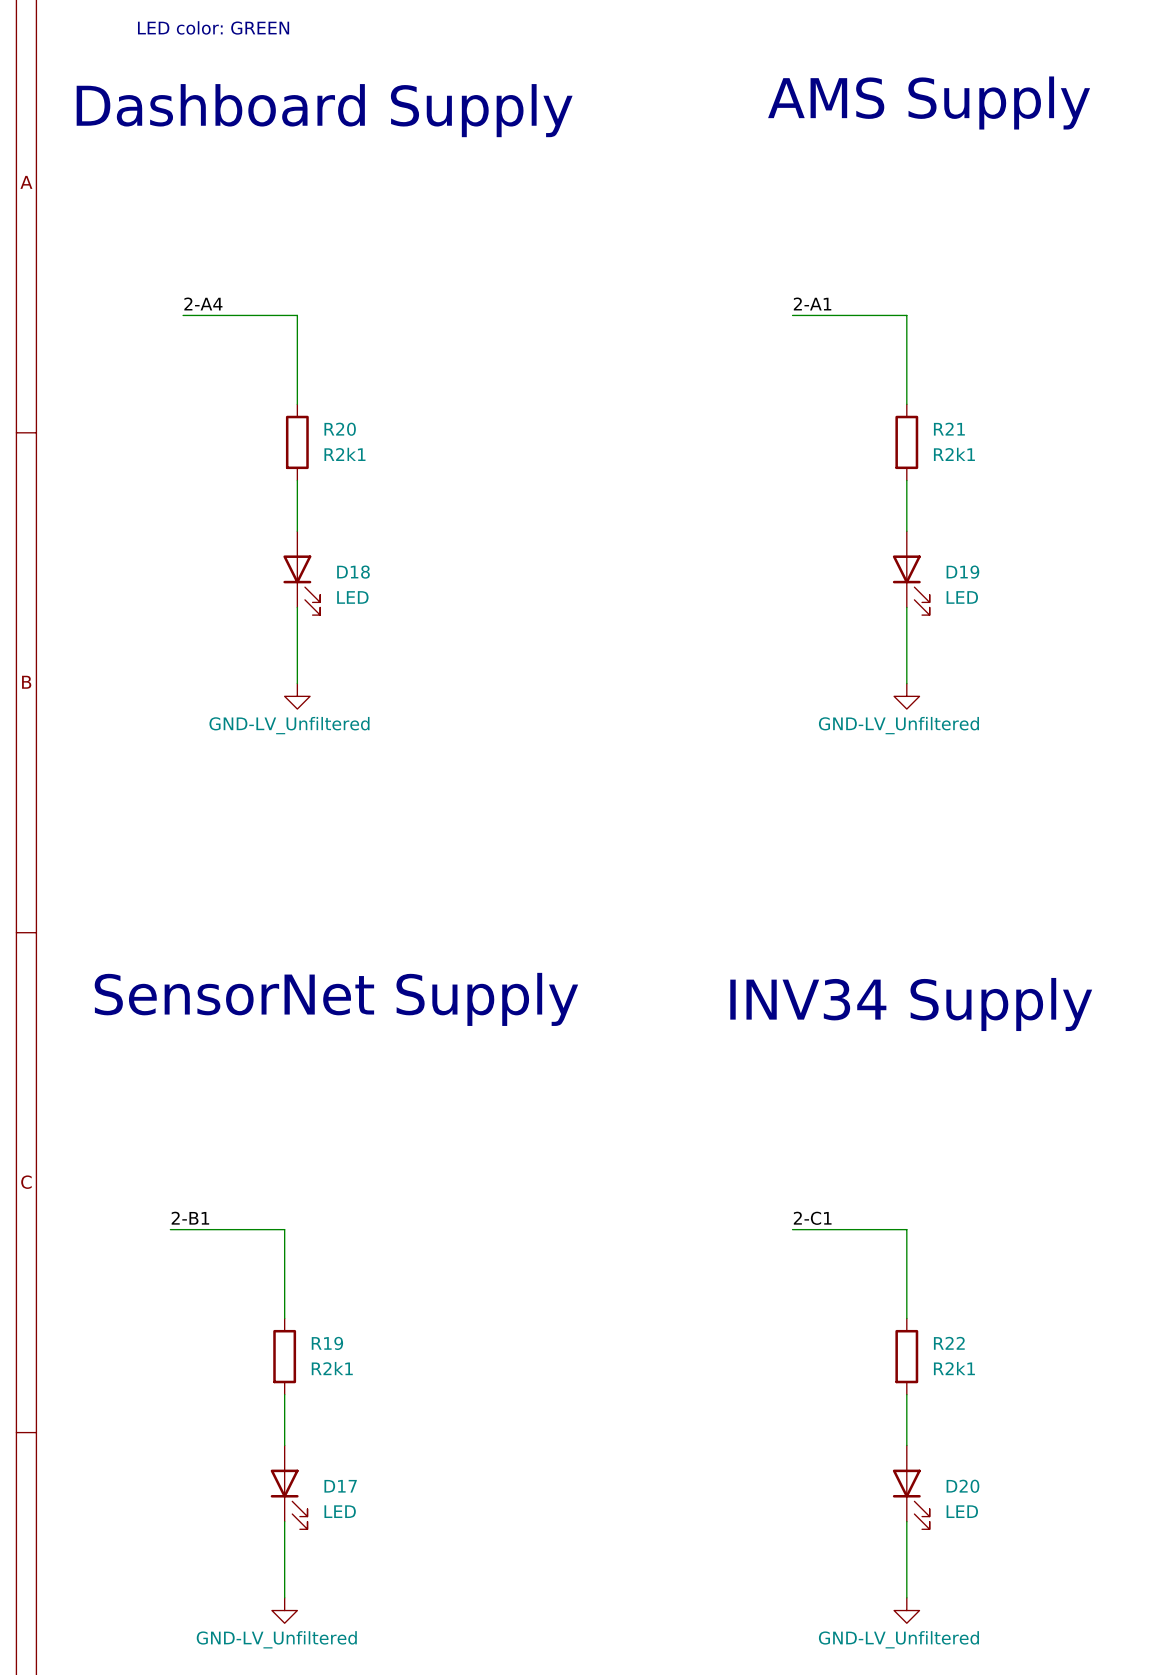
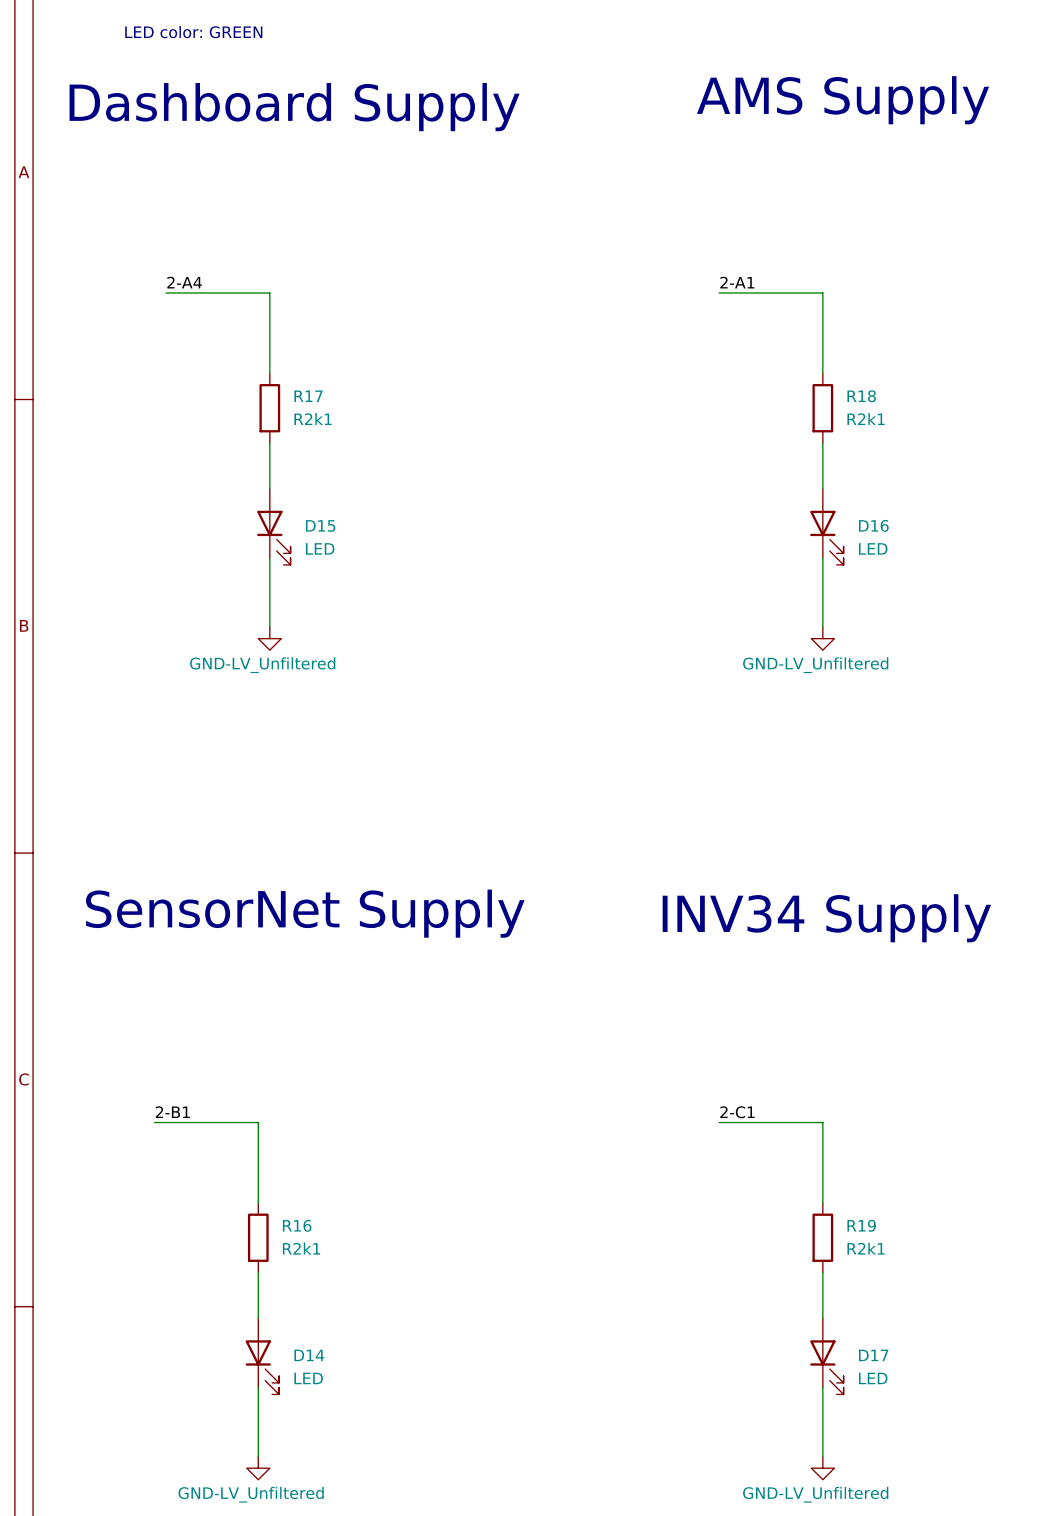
R20 name: R20 (340, 429) -> R17 (308, 396)
R21 name: R21 (949, 429) -> R18 (861, 396)
D18 name: D18 (353, 572) -> D15 (320, 525)
D19 name: D19 (962, 572) -> D16 (873, 525)
R19 name: R19 (327, 1343) -> R16 (297, 1225)
R22 name: R22 (949, 1343) -> R19 (861, 1225)
D17 name: D17 (340, 1486) -> D14 (309, 1355)
D20 name: D20 (962, 1486) -> D17 (873, 1355)

